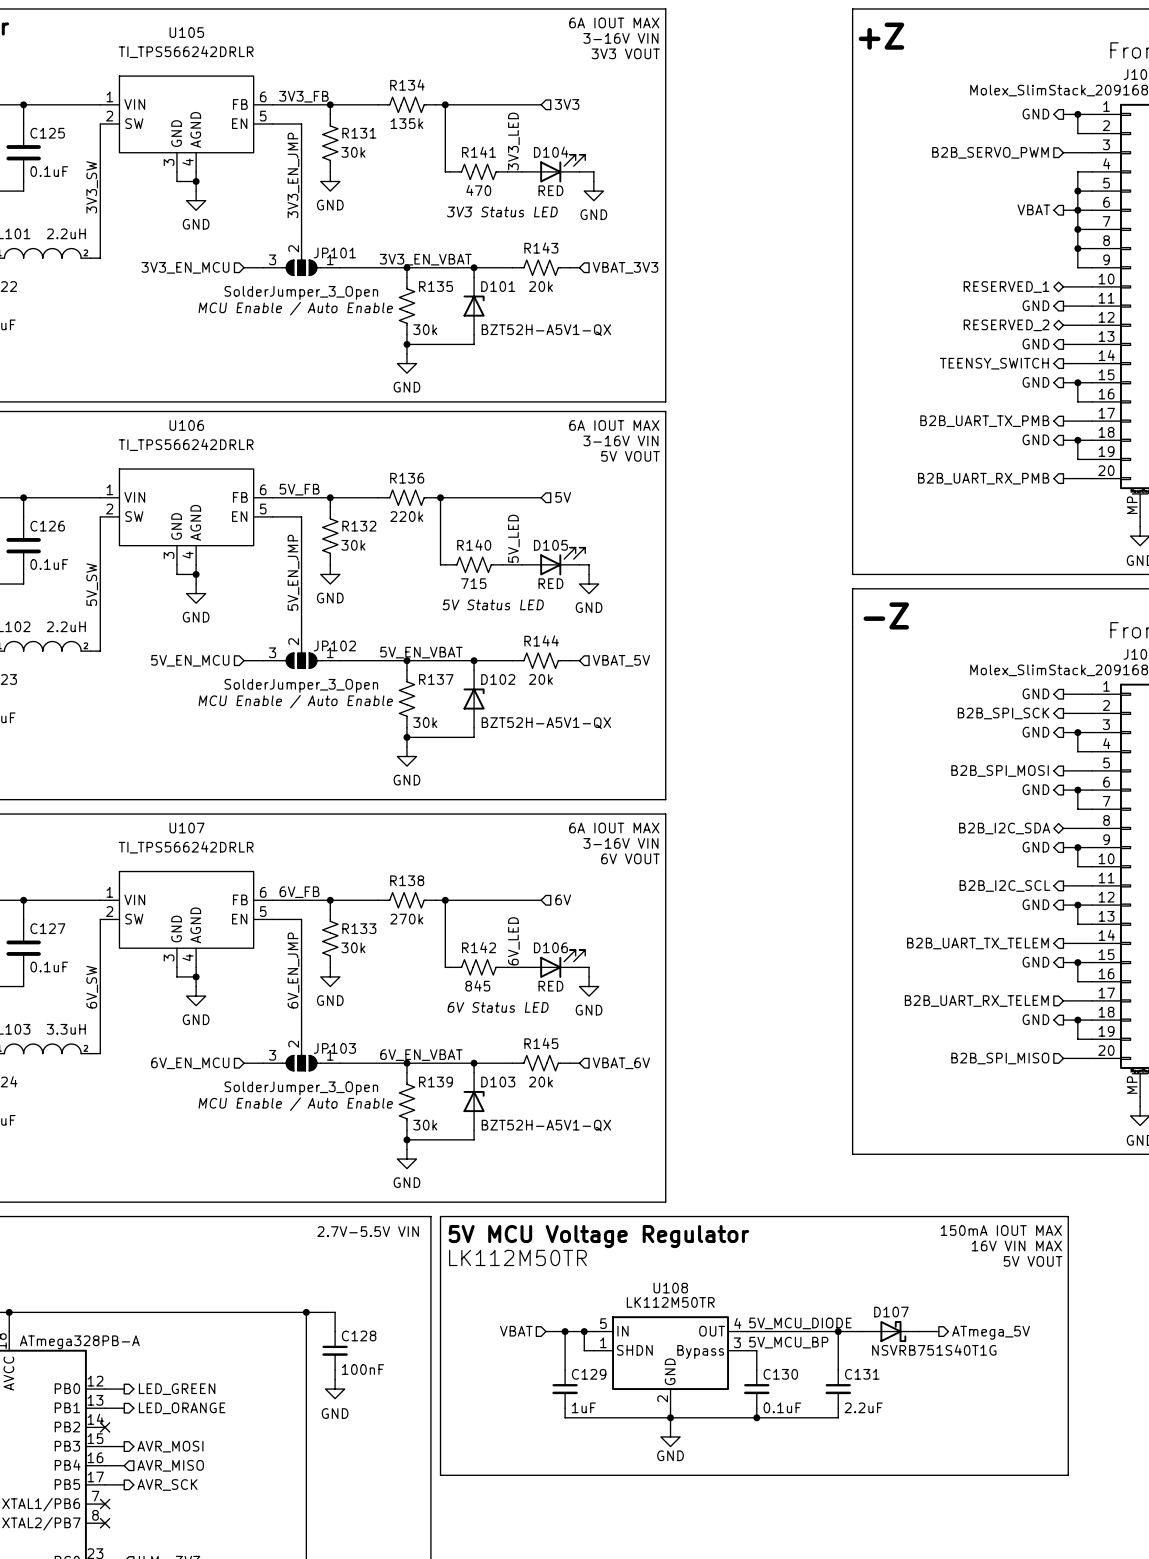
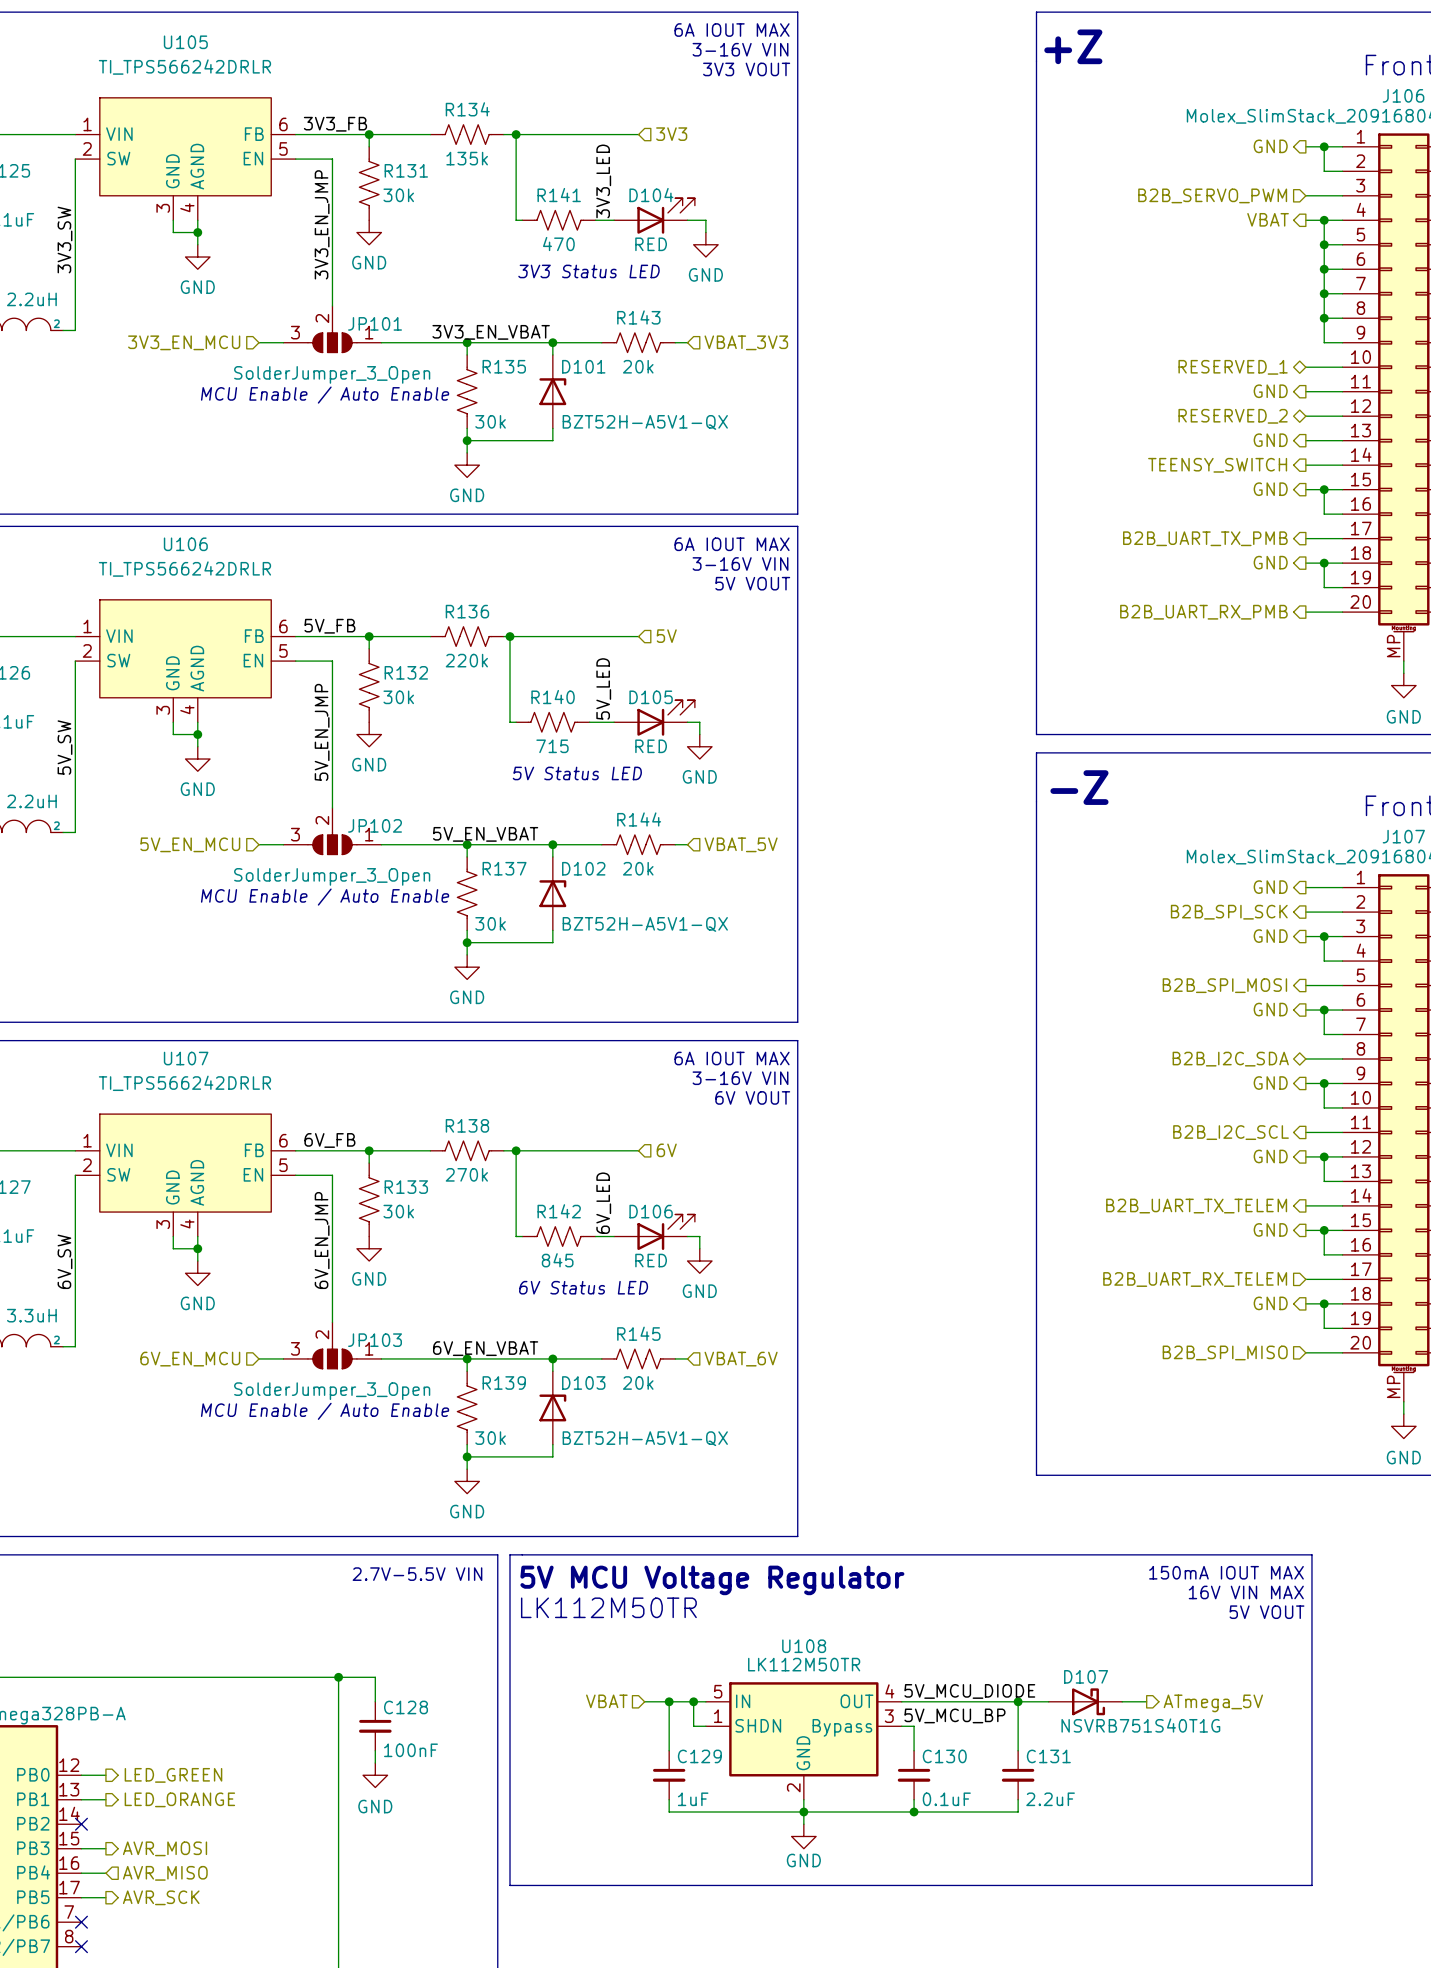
junction: none -> (1324, 220)
hierarchical label position: VBAT (1033, 209) -> VBAT (1268, 219)
wire: (1063, 210) (1077, 210) -> (1305, 220) (1324, 220)

